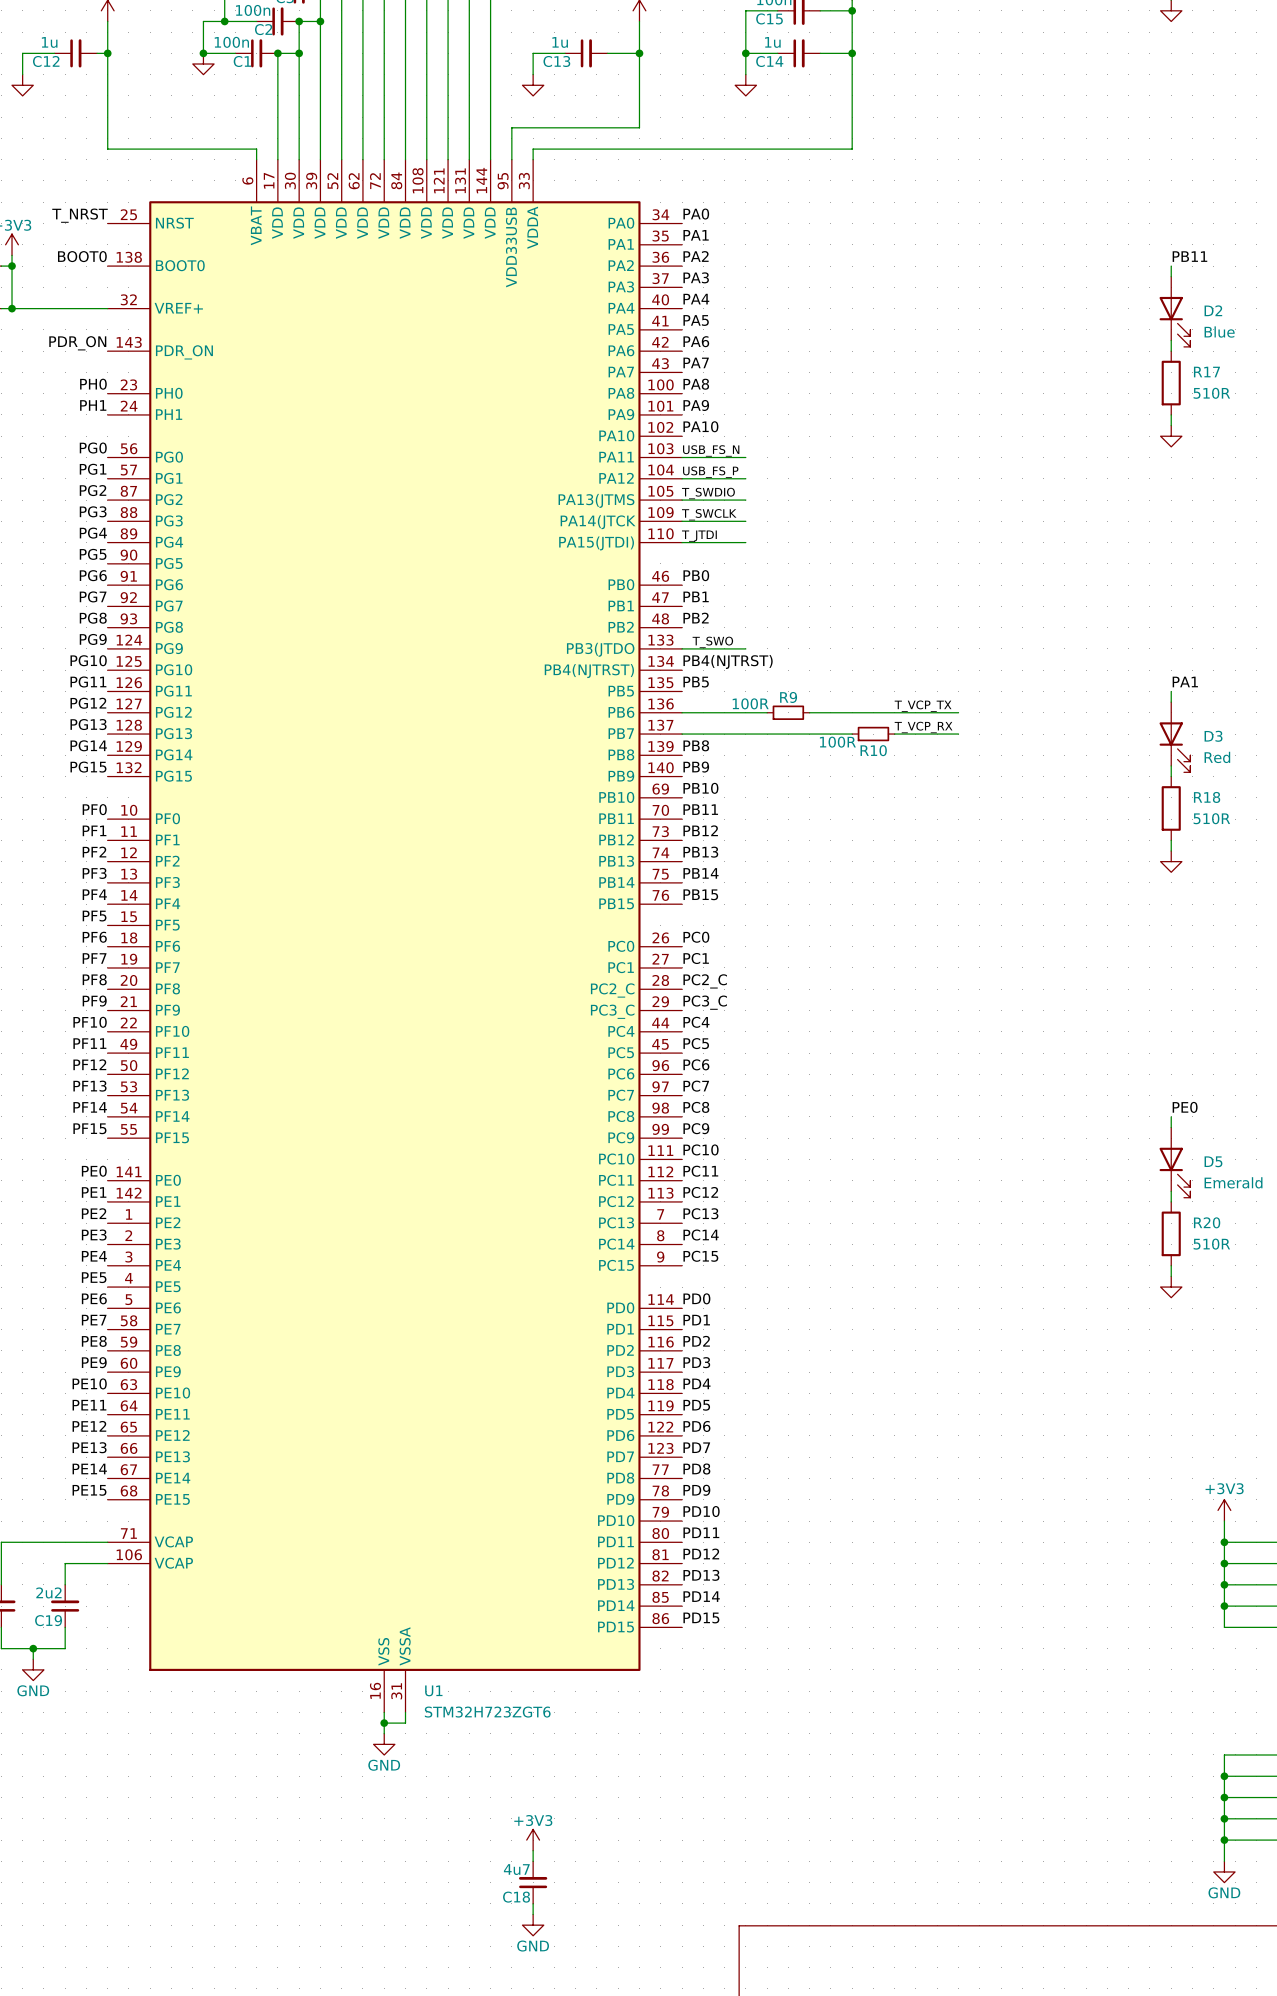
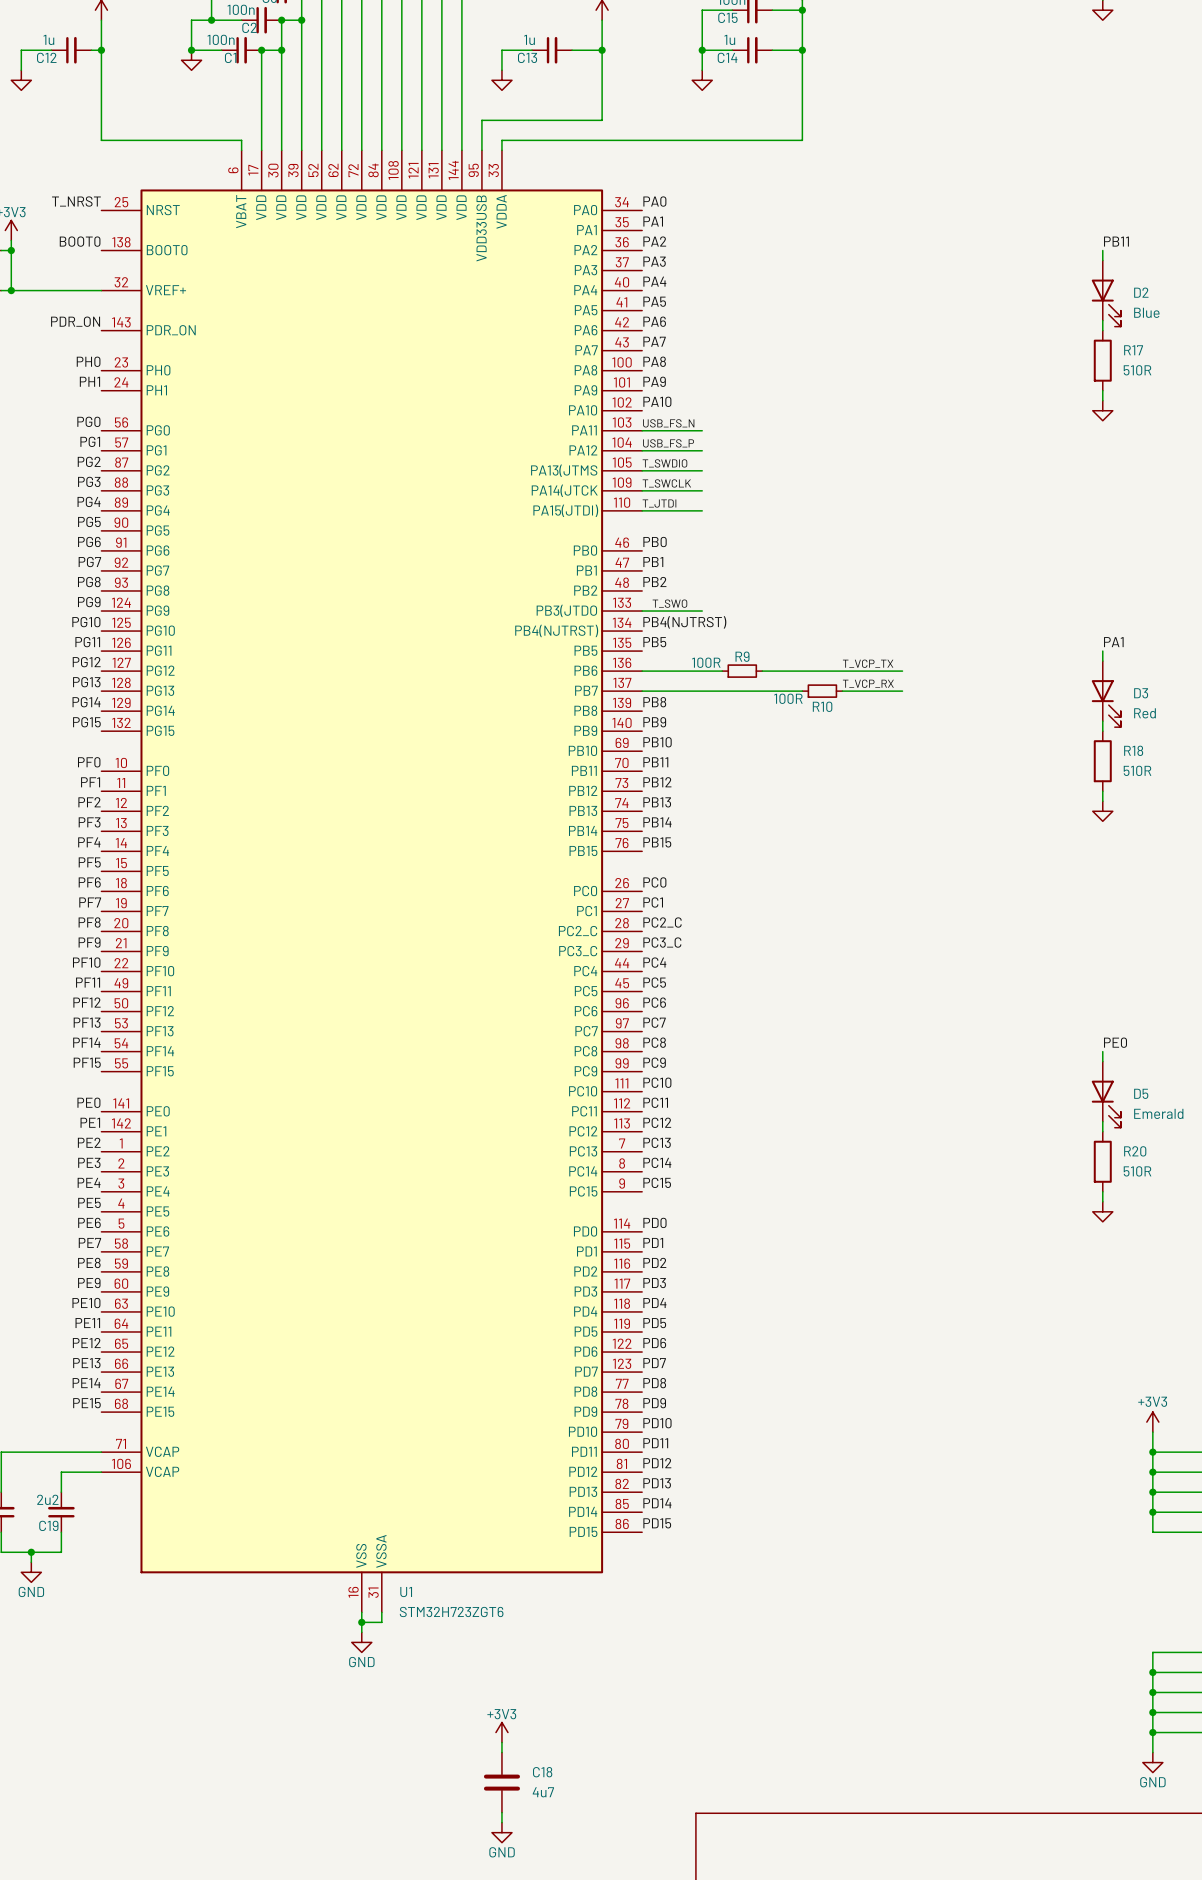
C18 symbol: [518, 1861, 548, 1904] -> [483, 1752, 520, 1813]
C18 value position: 4u7 (516, 1869) -> 4u7 (543, 1792)
C18 name position: C18 (516, 1897) -> C18 (542, 1772)
power symbol position: GND (533, 1925) -> GND (501, 1832)

